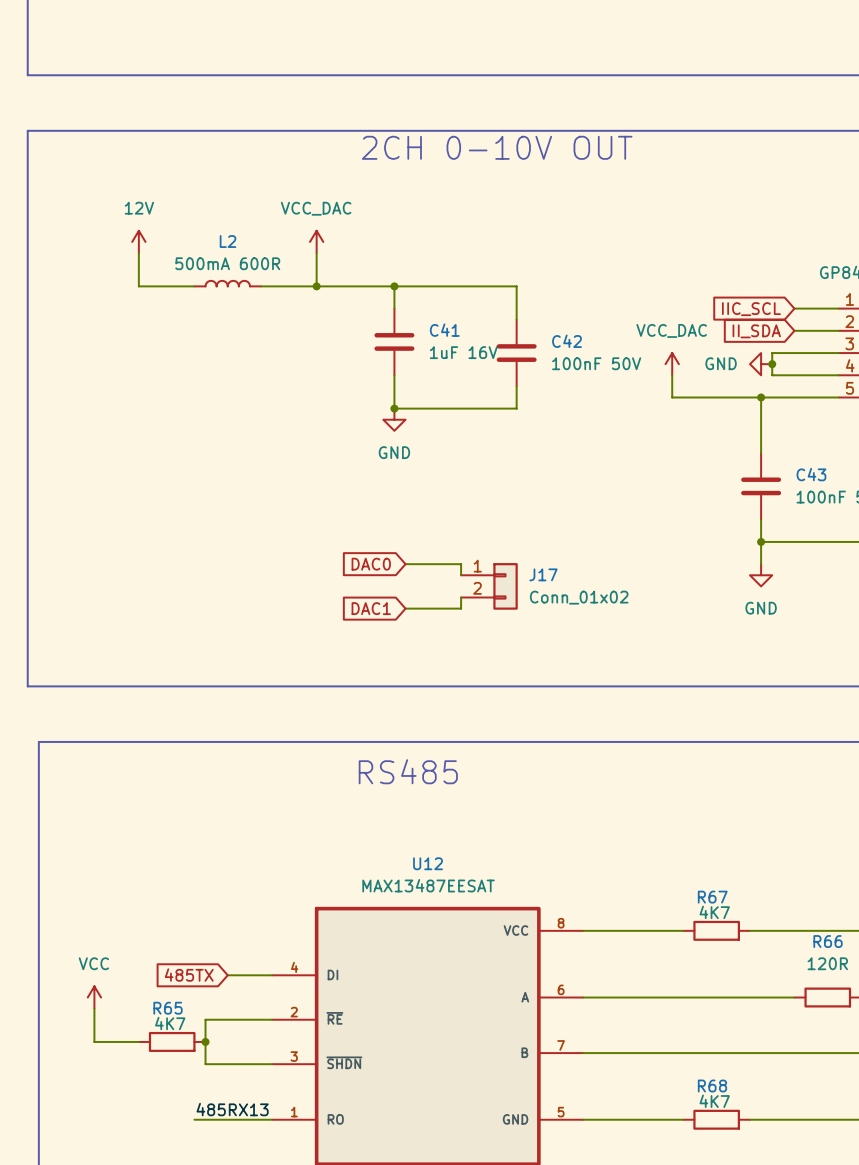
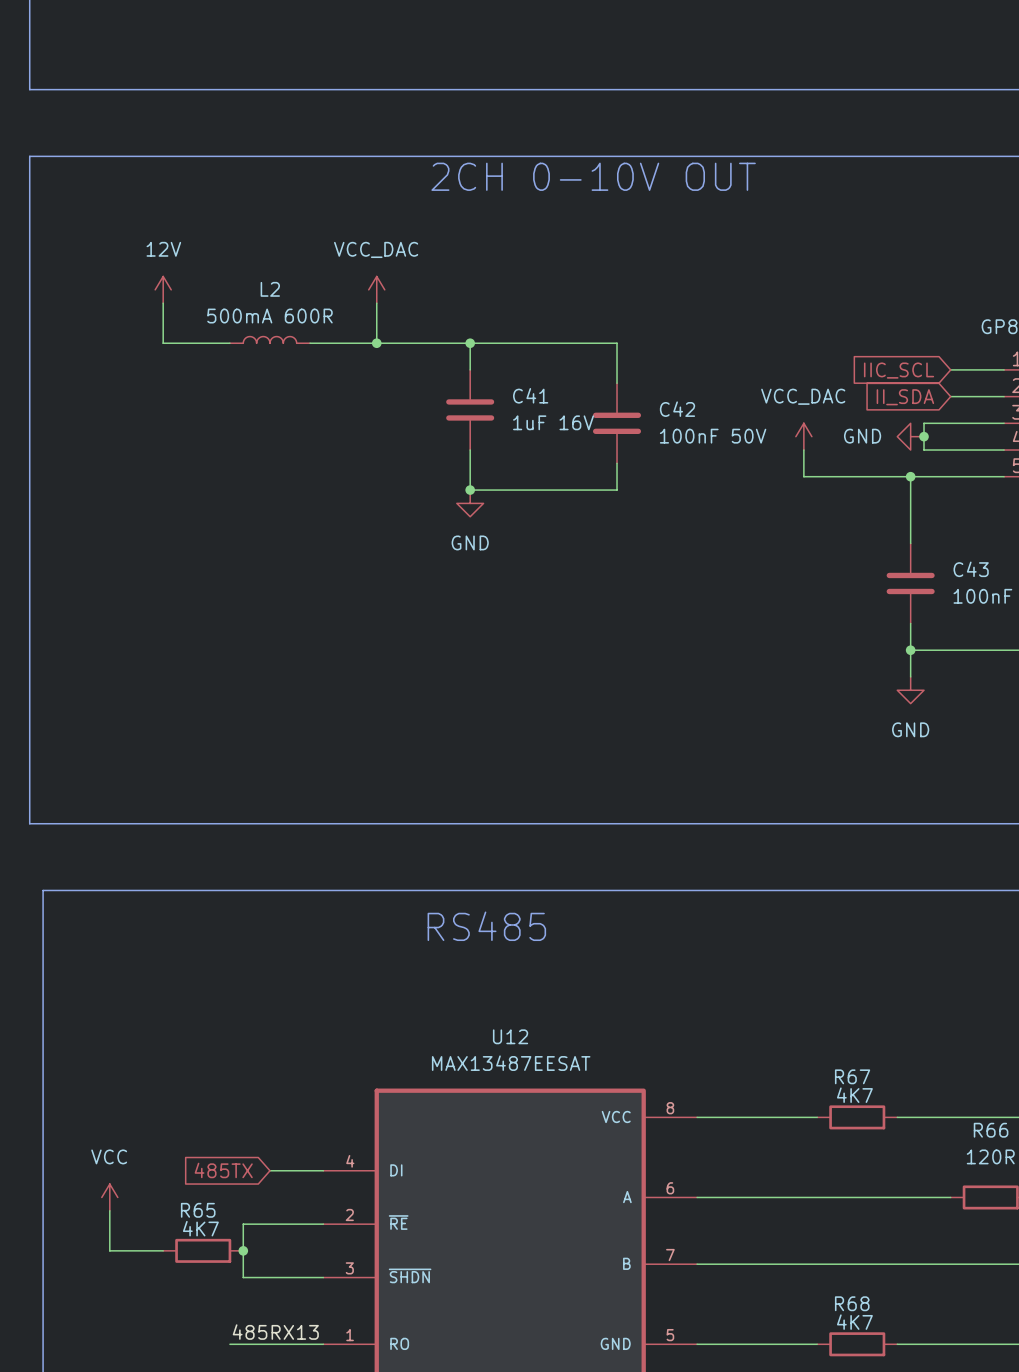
global label: DAC0 (371, 564) -> none
wire: (405, 564) (461, 564) (461, 575) -> none
J17: Conn_01x02 (489, 586) -> none
wire: (461, 597) (461, 608) (405, 608) -> none
global label: DAC1 (371, 608) -> none

